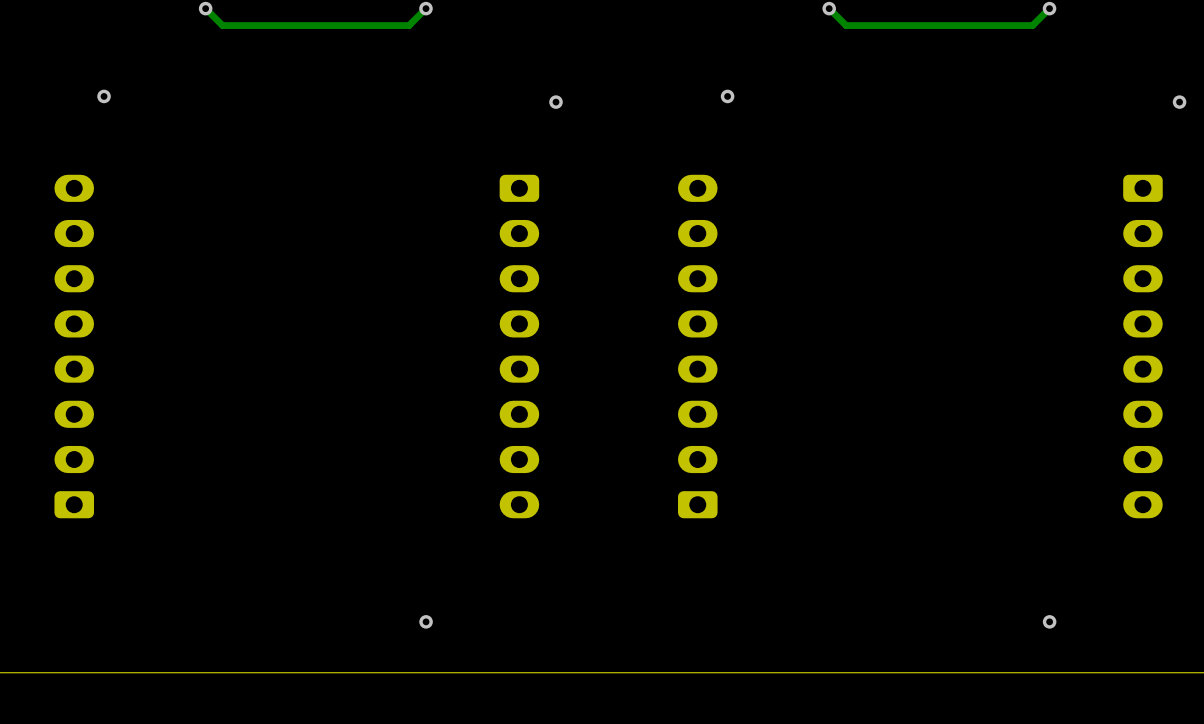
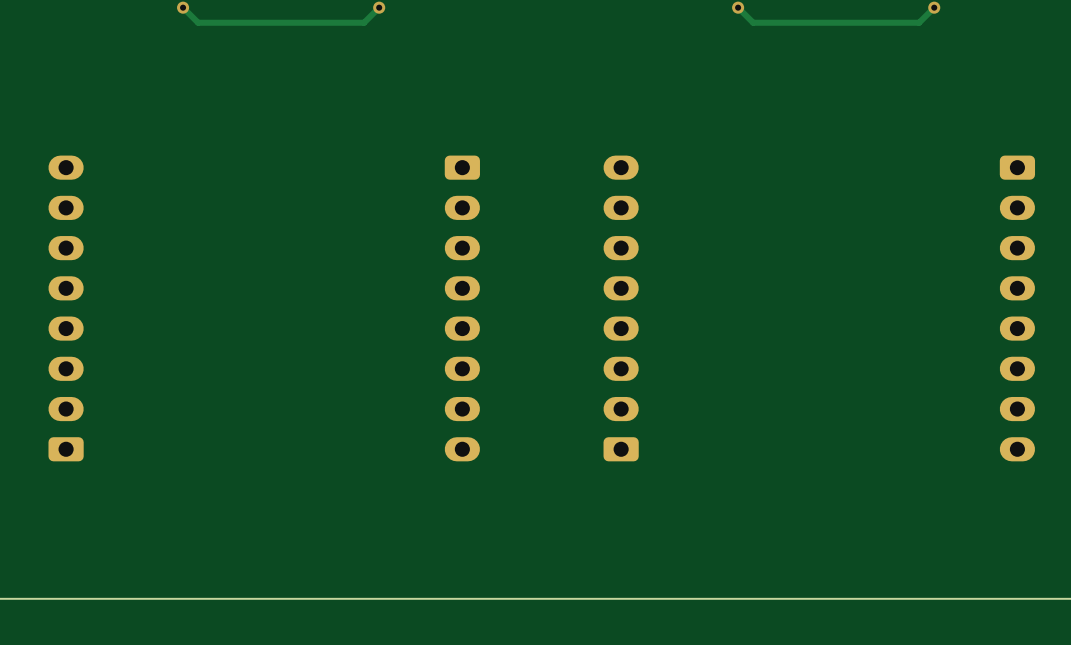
via: (104, 96) -> none
via: (727, 96) -> none
via: (556, 102) -> none
via: (1179, 102) -> none
via: (426, 621) -> none
via: (1049, 621) -> none

